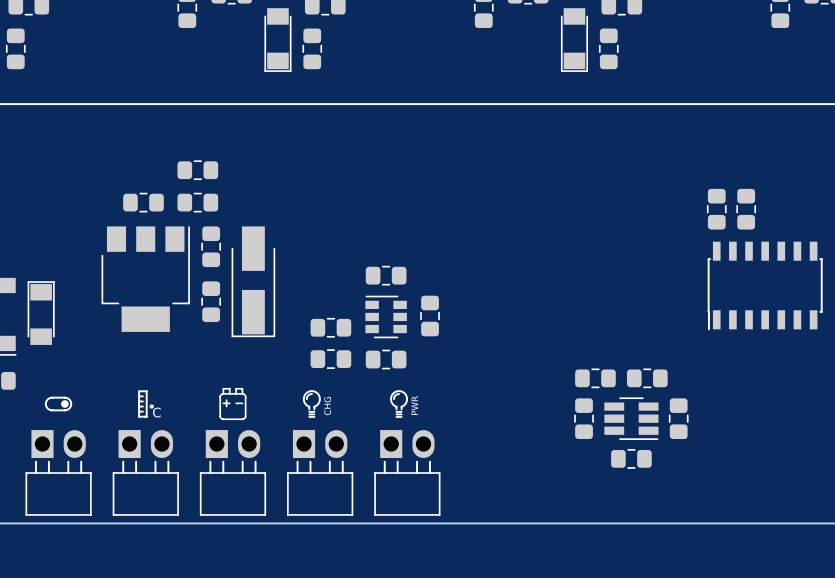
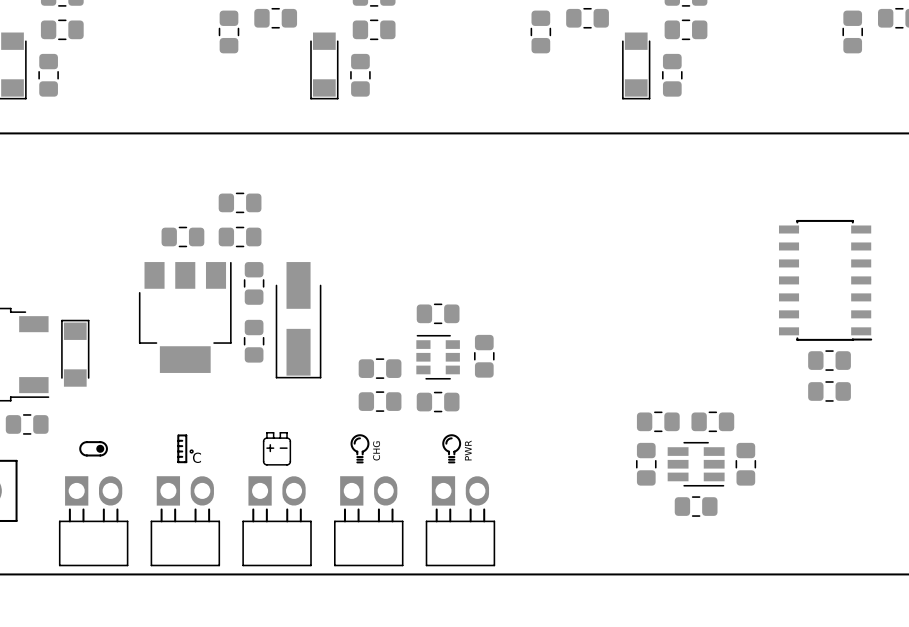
part: (716, 209) -> none
part: (746, 209) -> none
part rotation: 0° (765, 285) -> 90° counterclockwise (825, 280)
part: none -> (829, 360)
part: none -> (829, 391)

